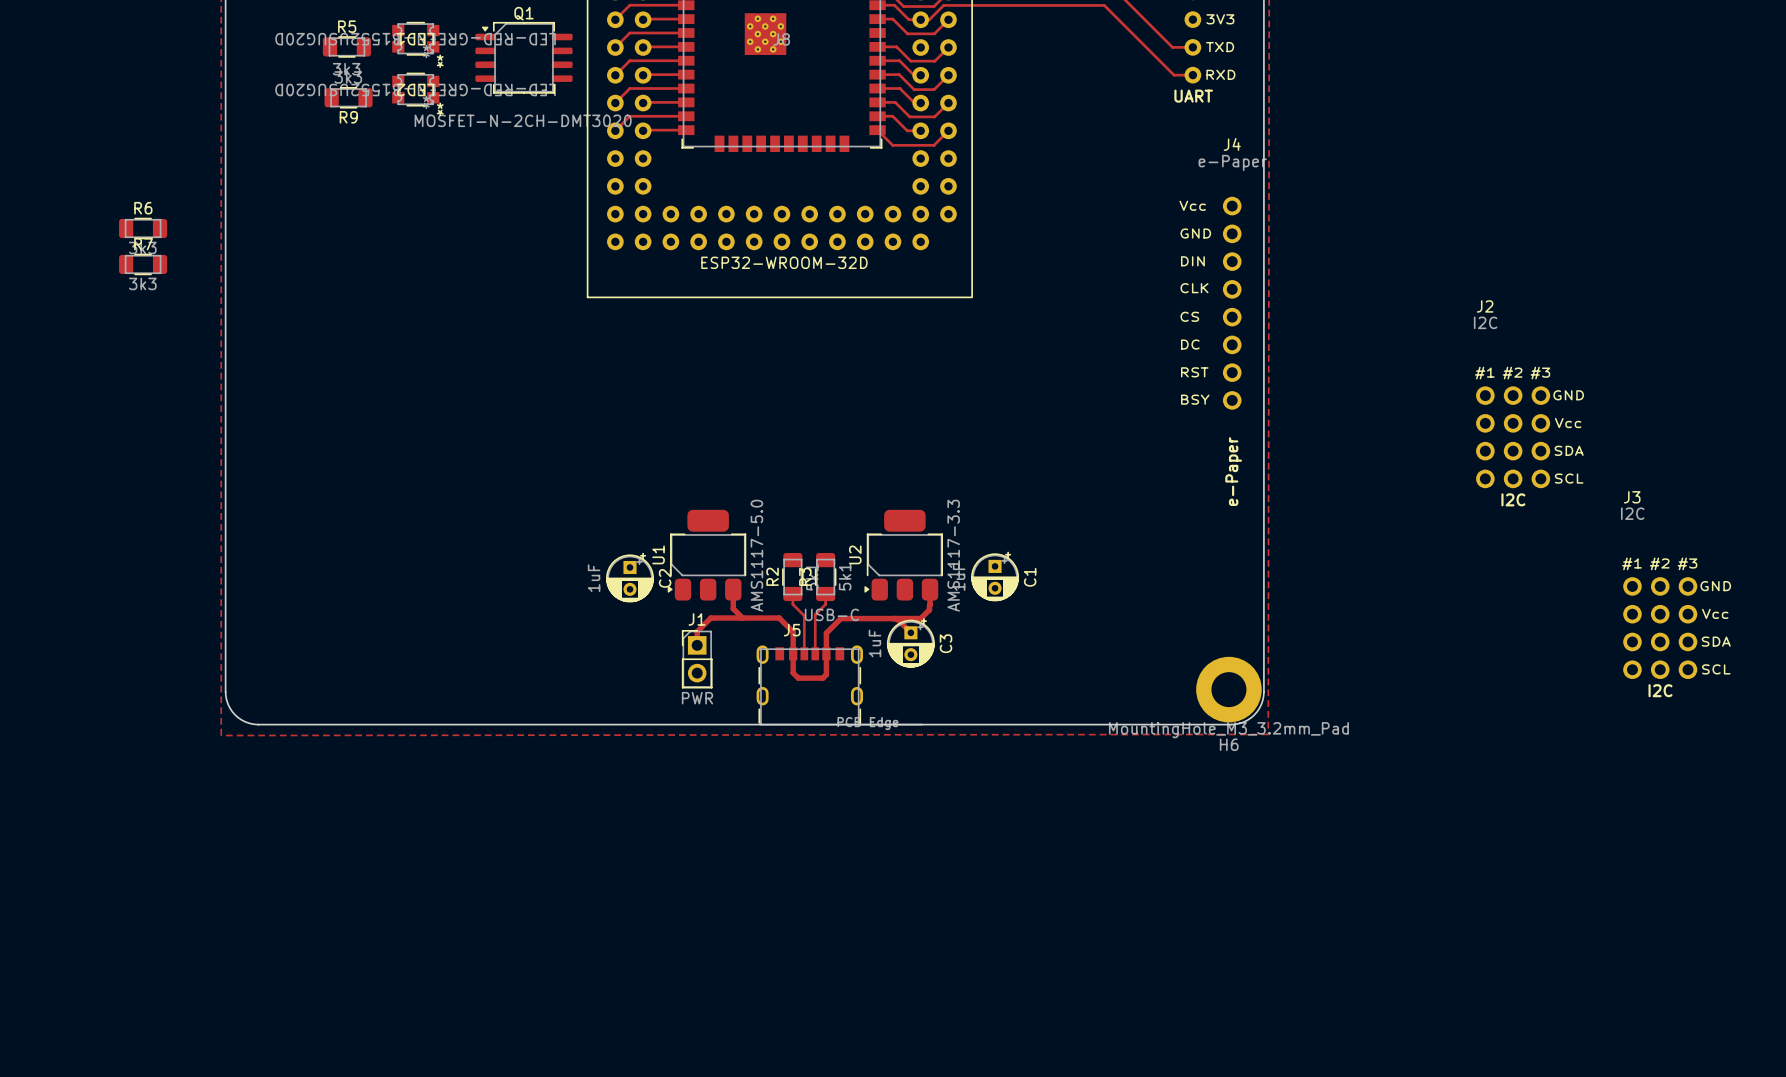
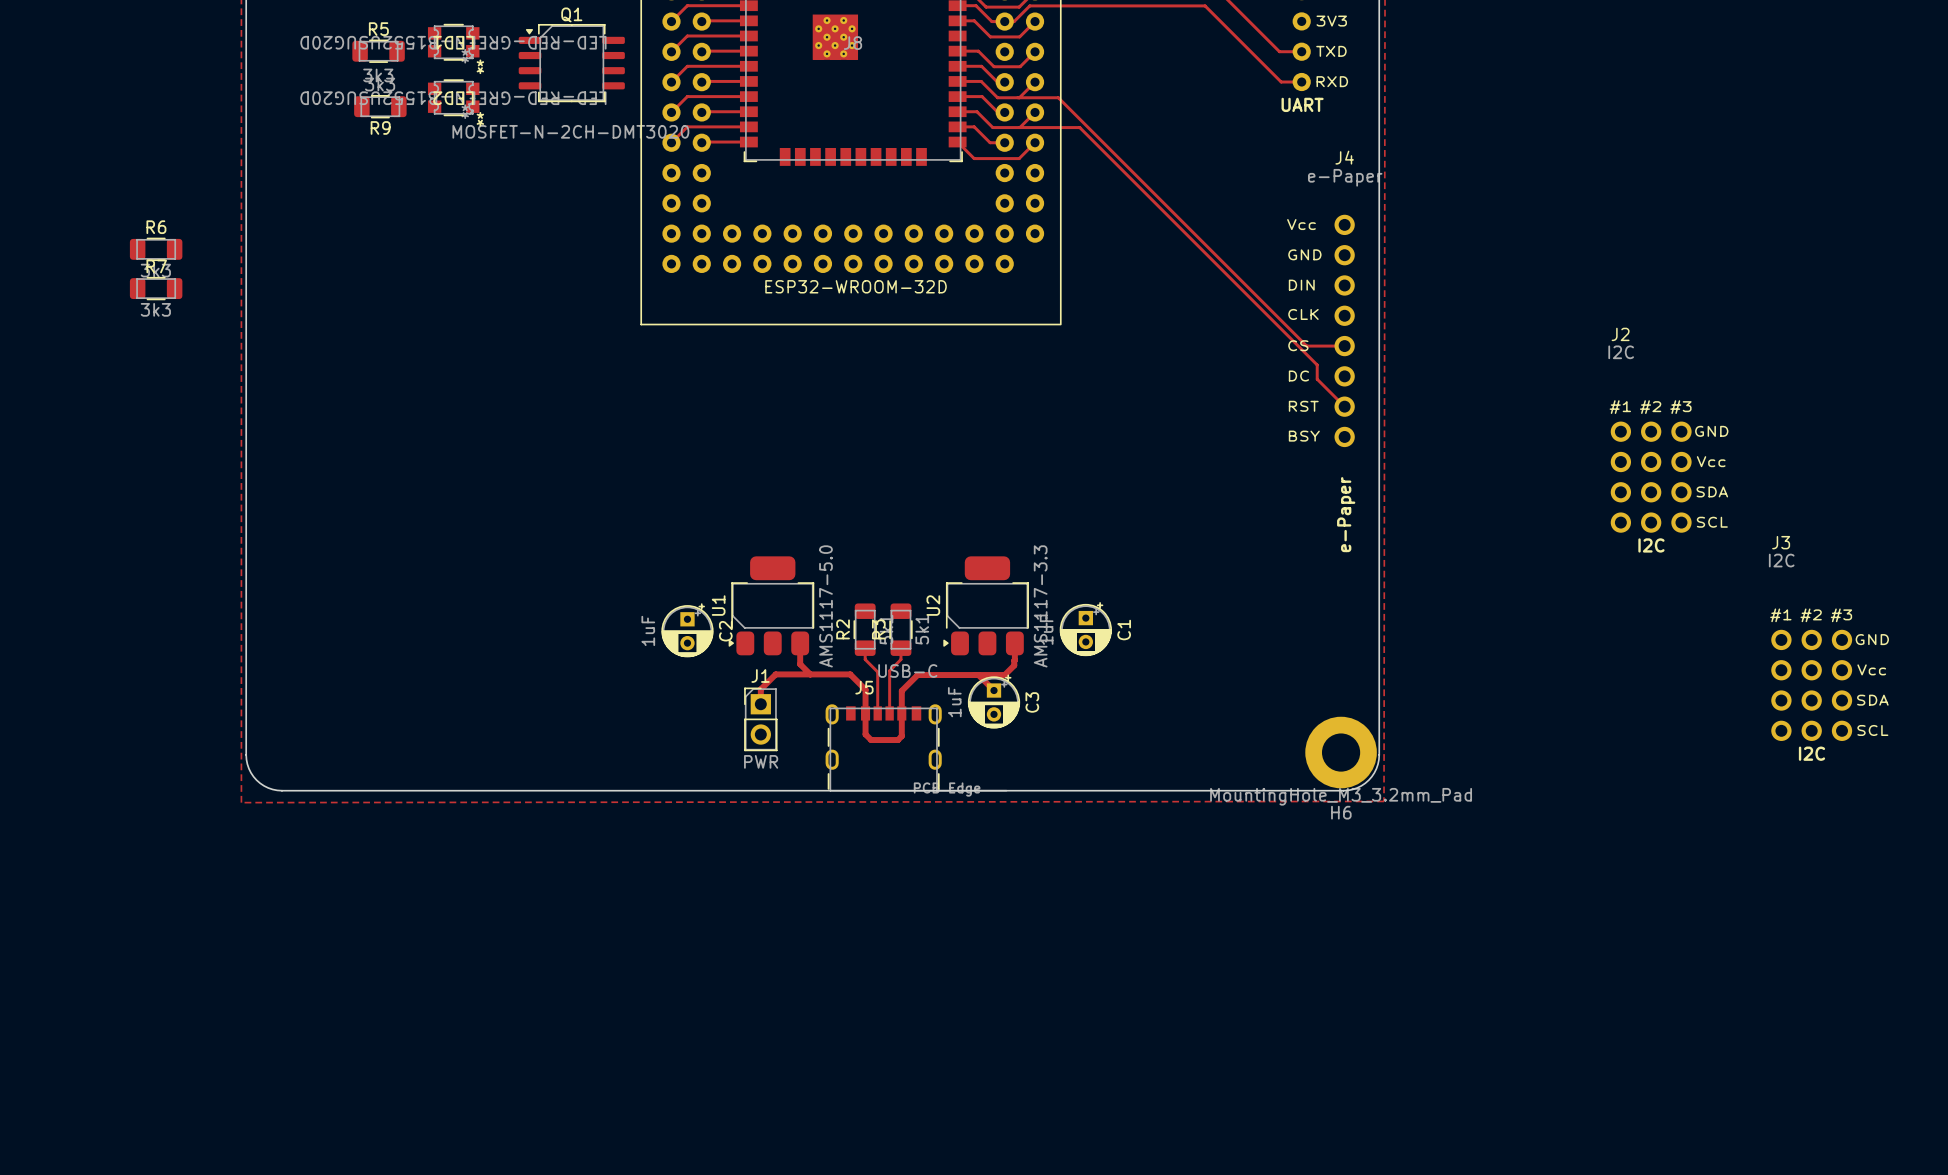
track: none -> (1019, 97) (1058, 97) (1306, 346) (1344, 346)
track: none -> (1019, 127) (1079, 127) (1317, 365) (1317, 379) (1344, 406)

